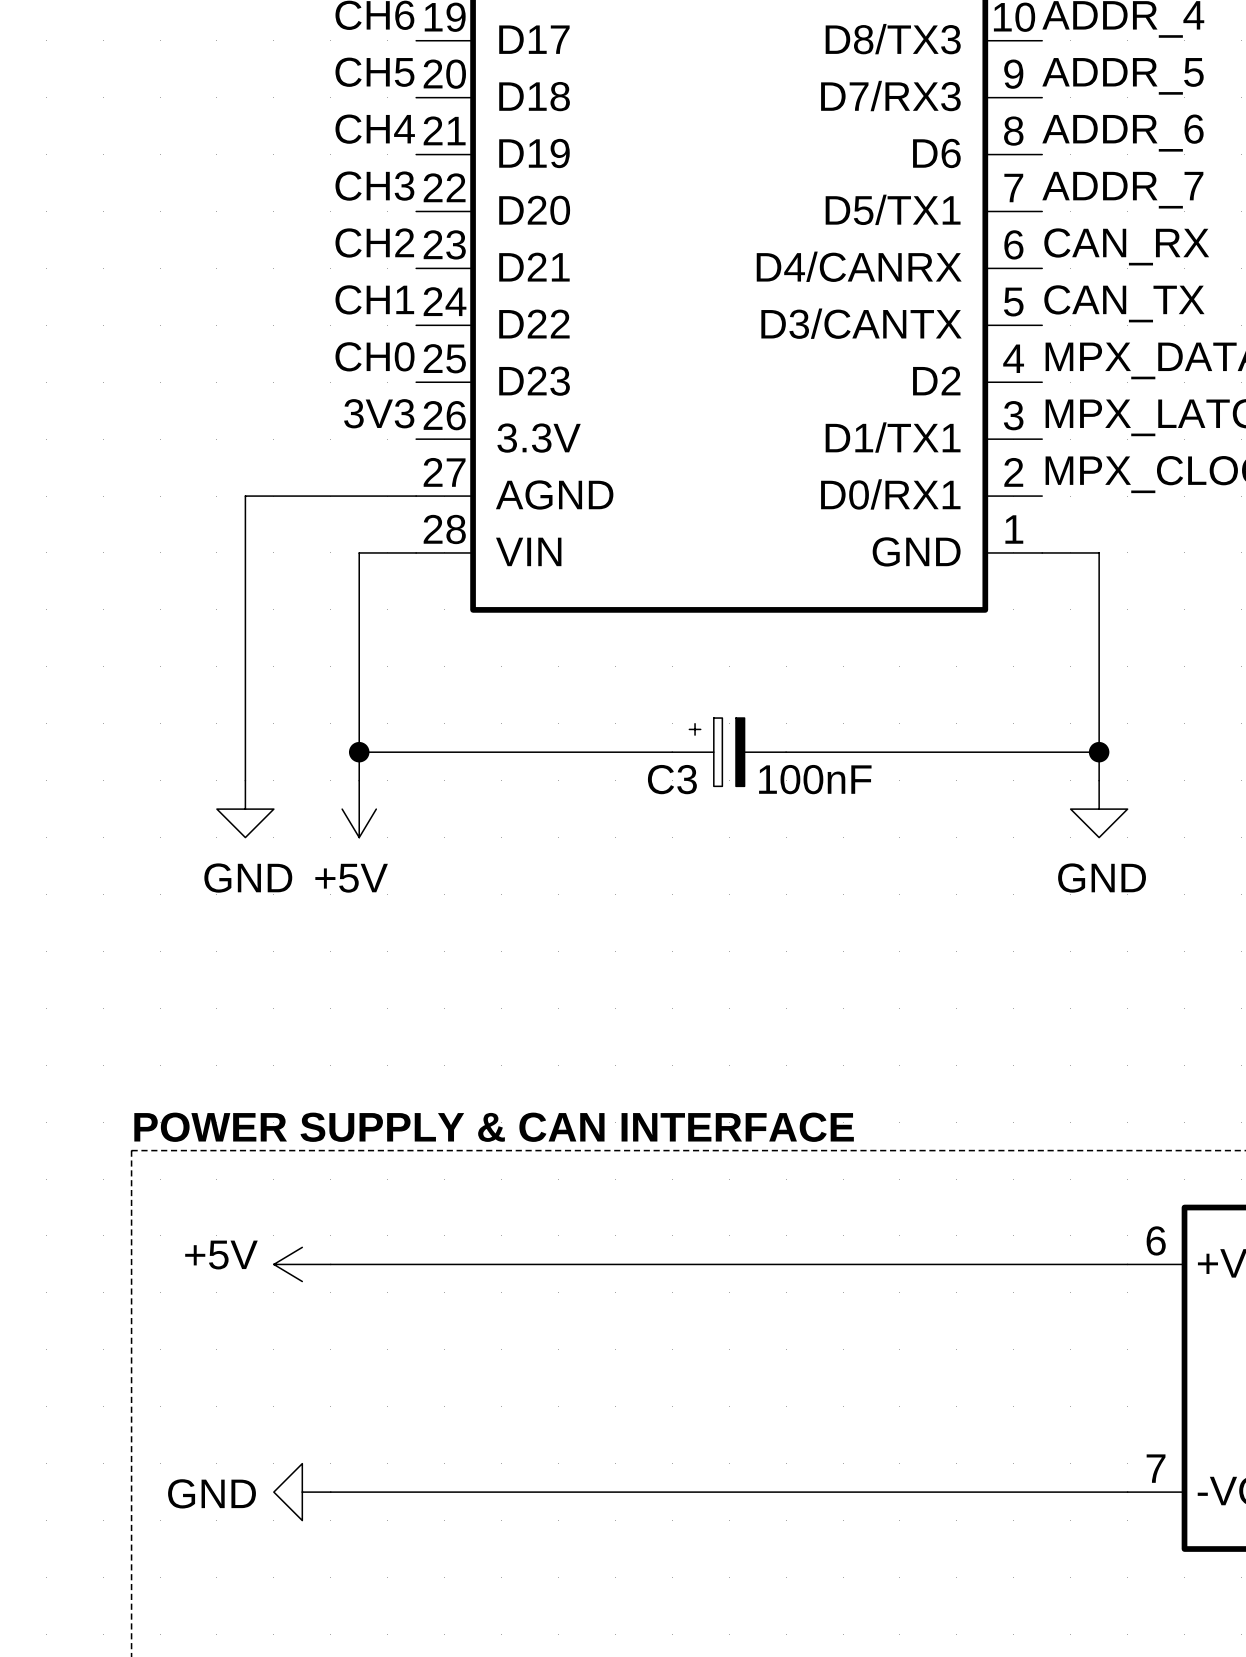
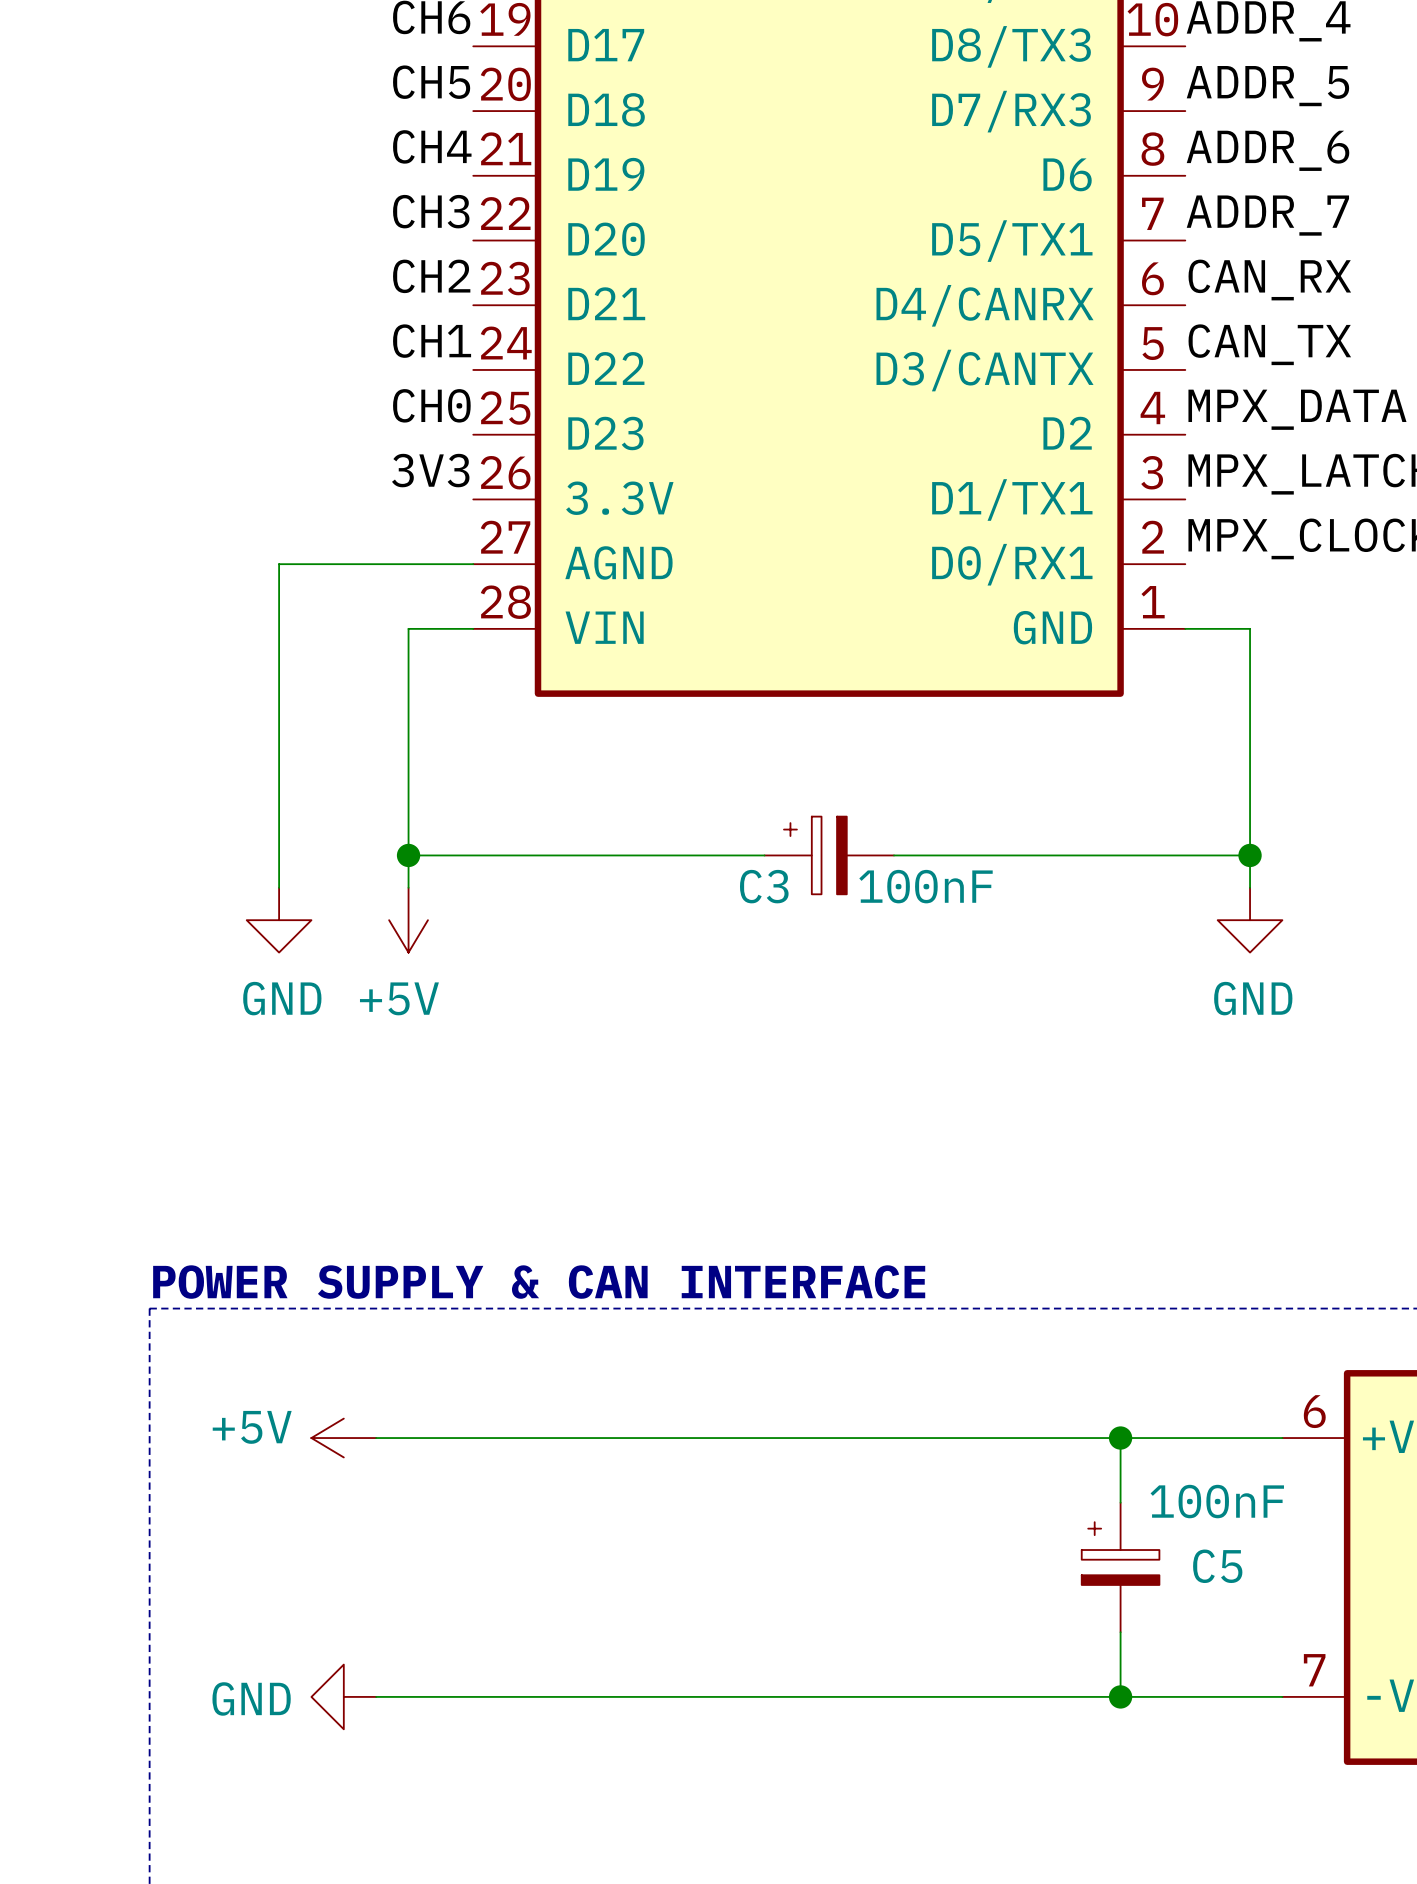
wire: none -> (1120, 1438) (1120, 1502)
junction: none -> (1120, 1438)
C5: none -> 100nF (1120, 1567)
wire: none -> (1120, 1632) (1120, 1696)
junction: none -> (1120, 1696)

